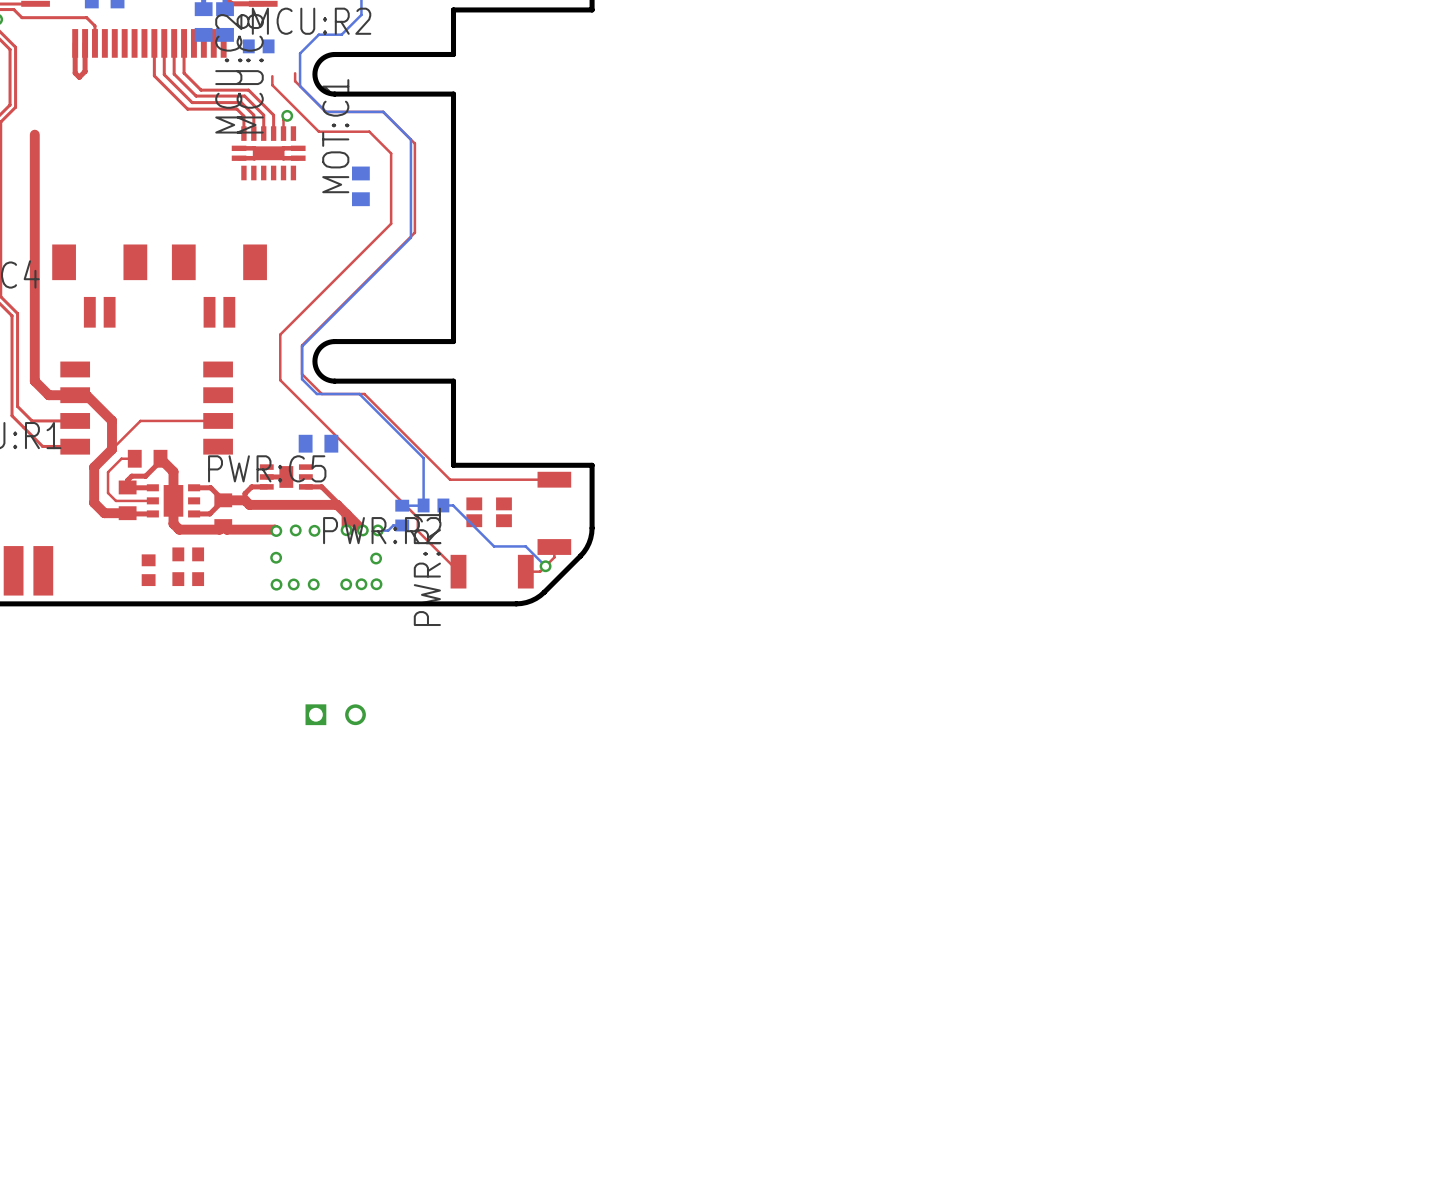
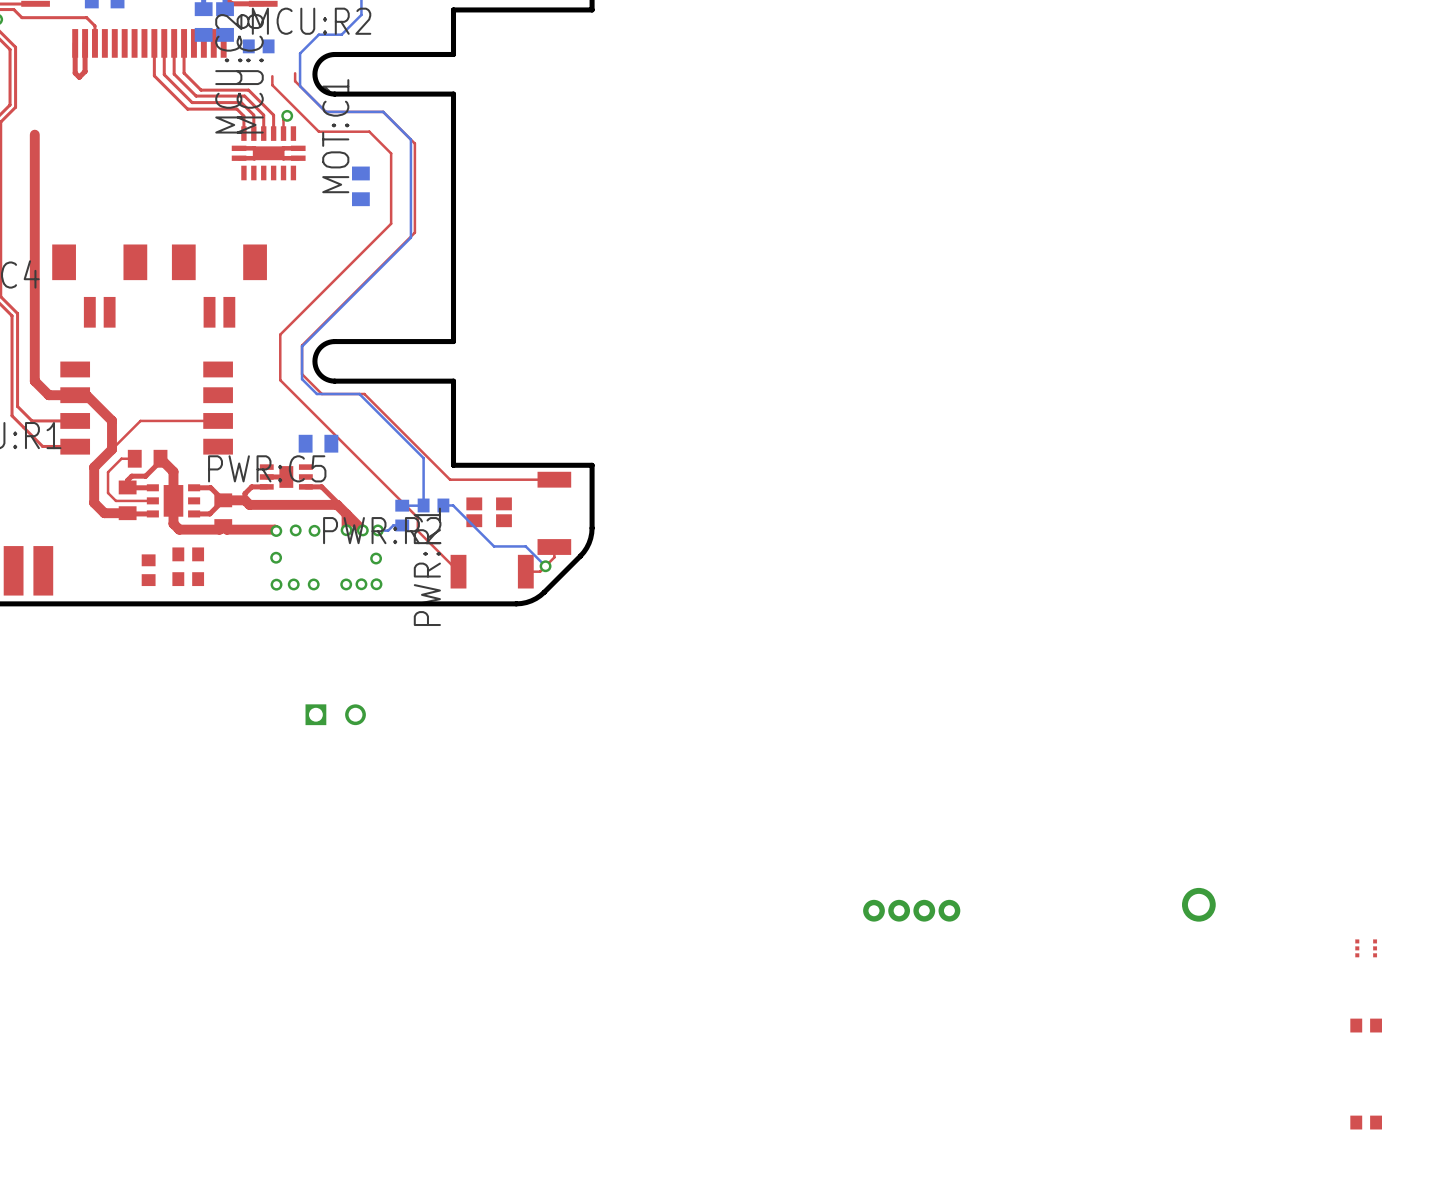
part: none -> (1198, 904)
part: none -> (911, 910)
part: none -> (1366, 948)
part: none -> (1366, 1025)
part: none -> (1366, 1122)

